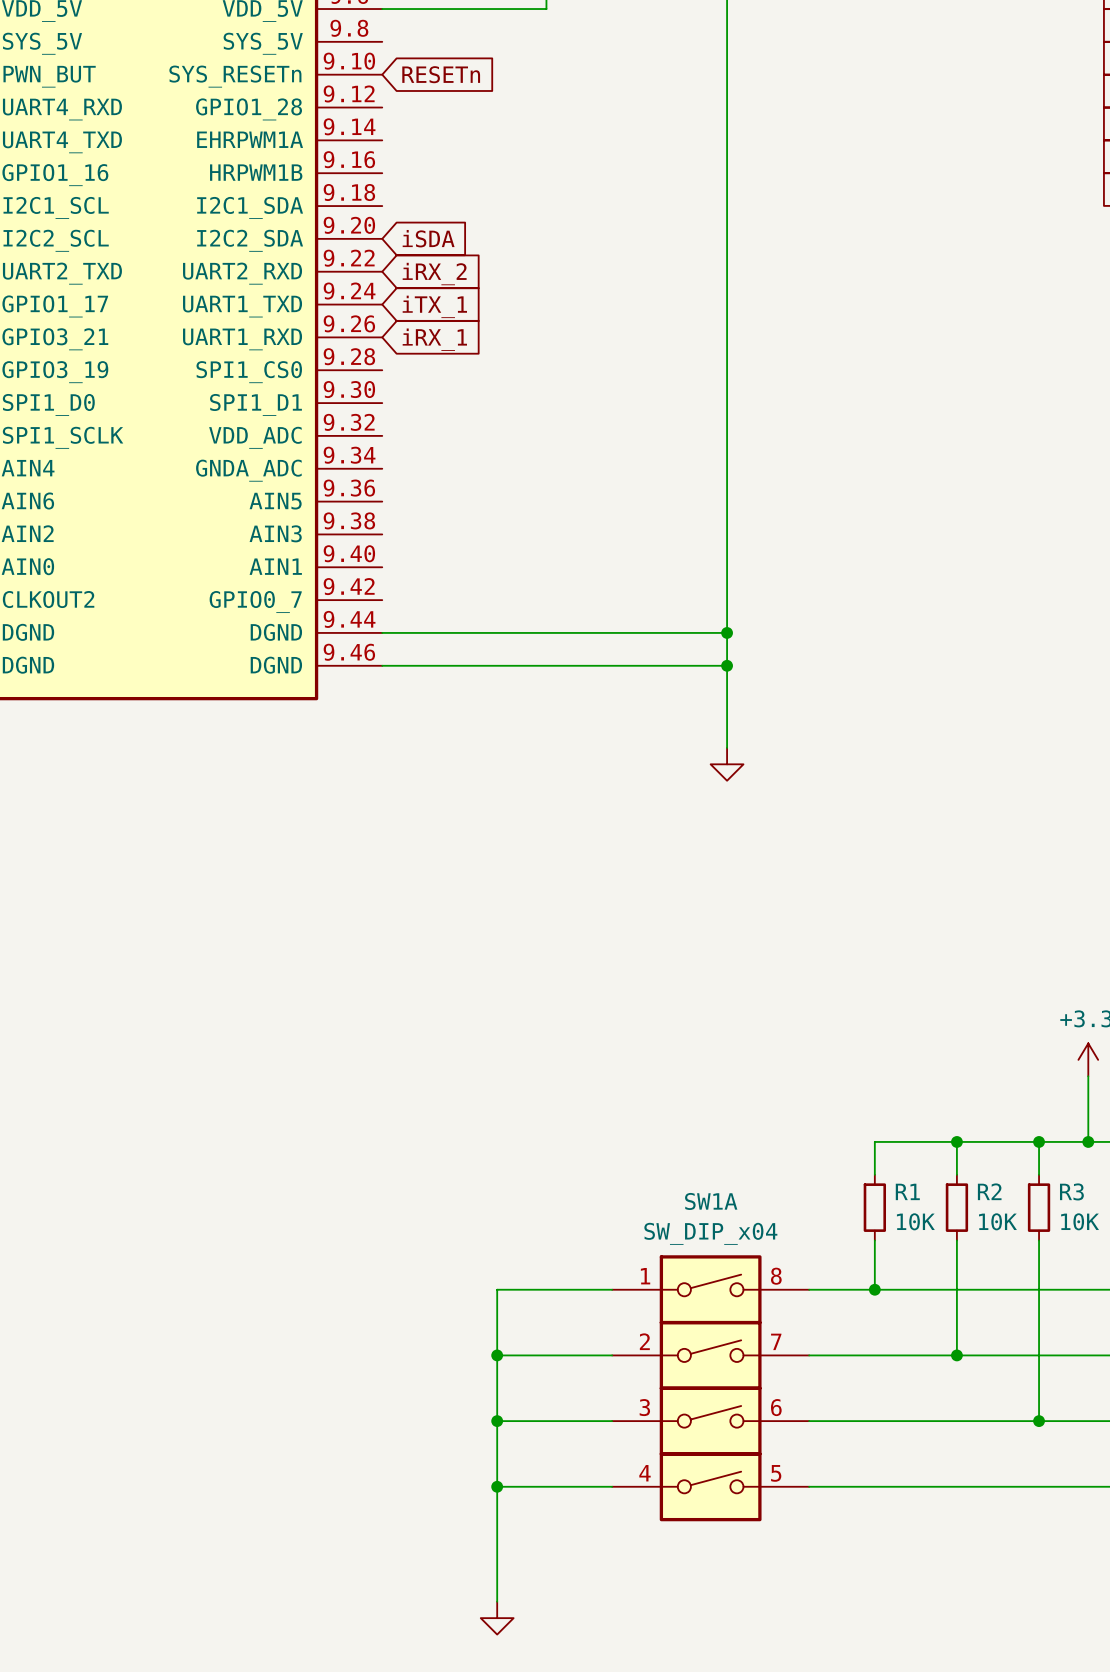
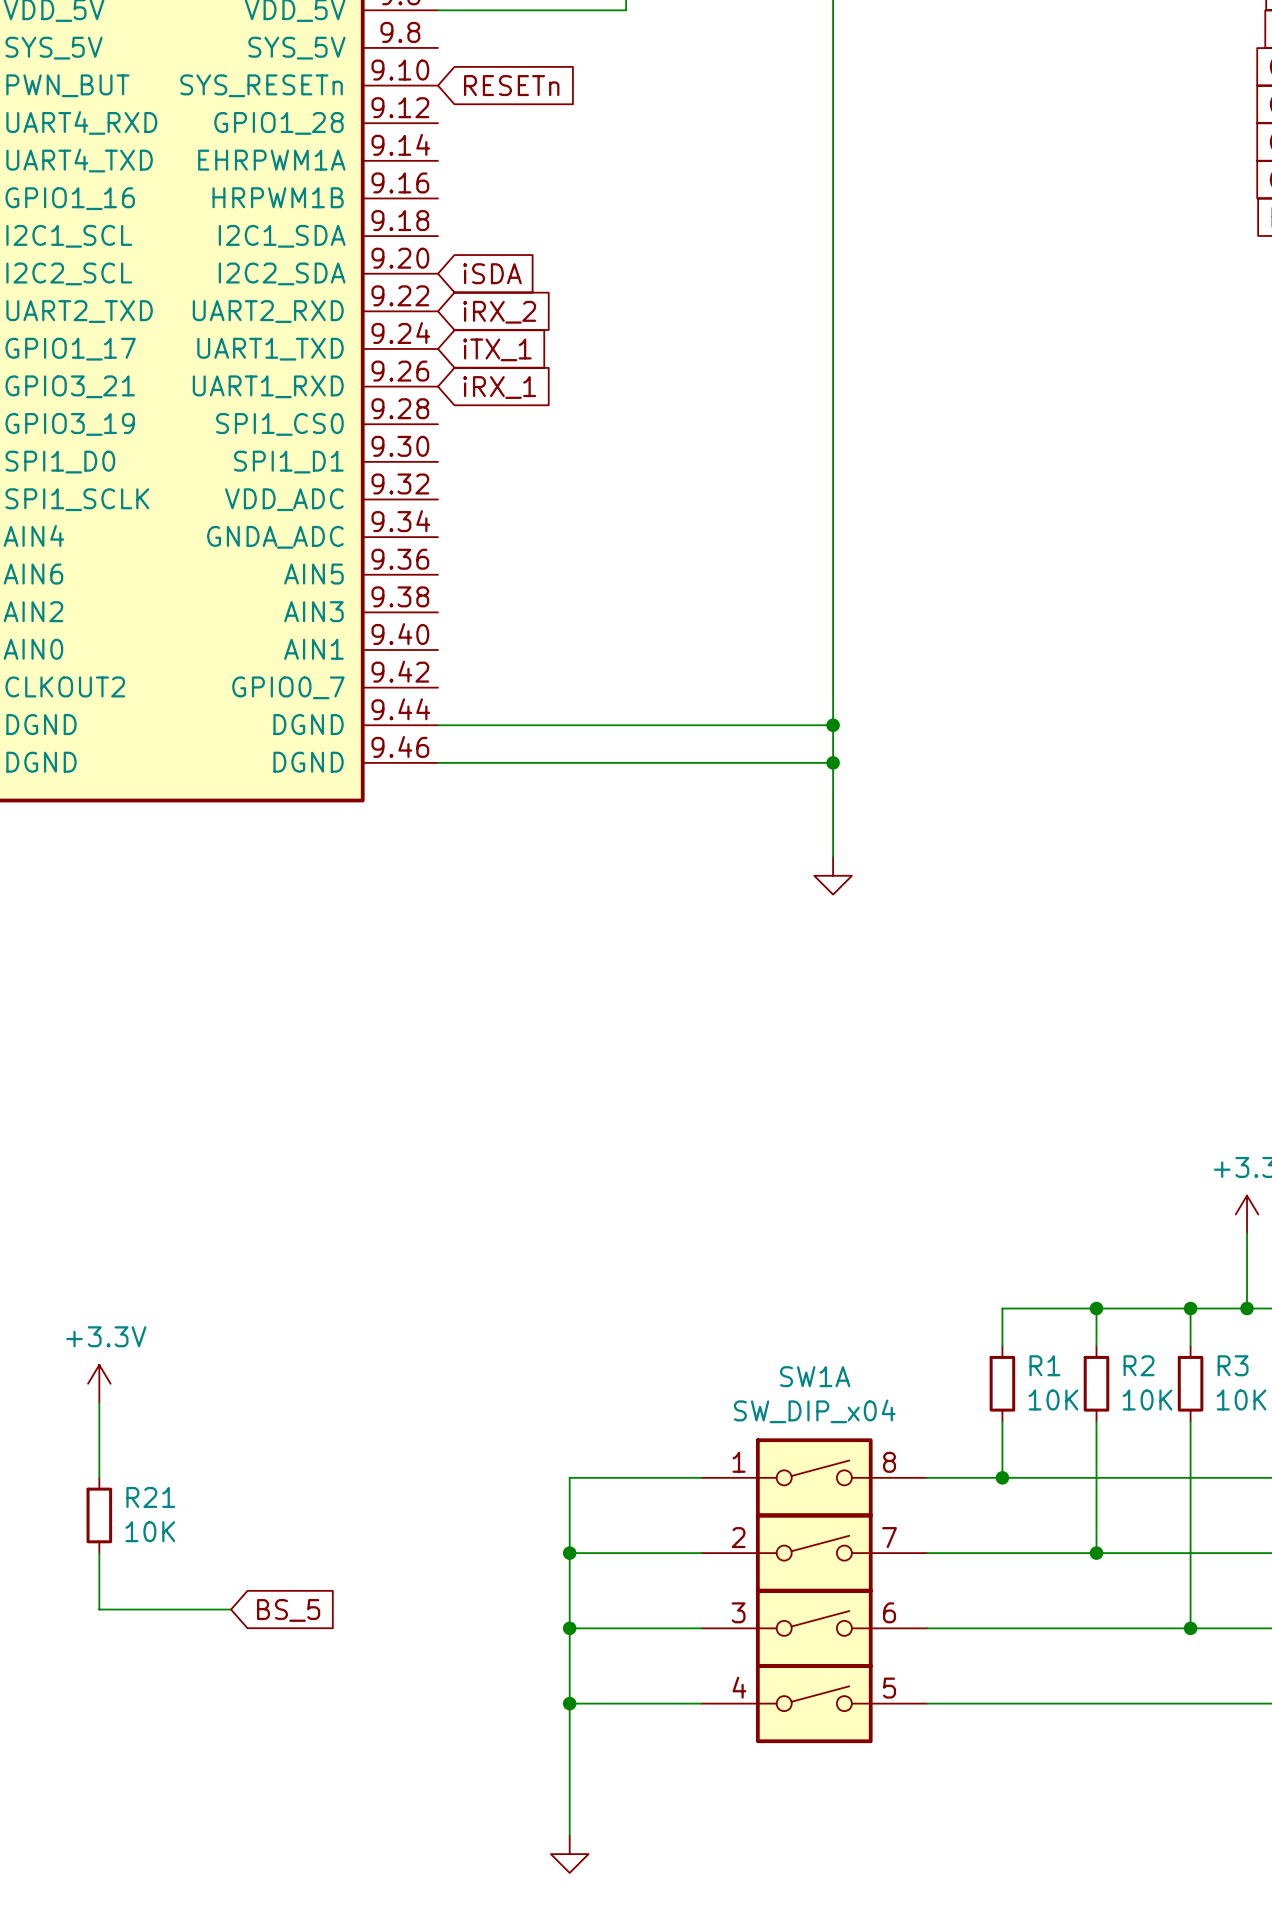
power symbol: none -> +3.3V (99, 1383)
wire: none -> (99, 1402) (99, 1477)
R21: none -> 10K (99, 1515)
wire: none -> (99, 1553) (99, 1609) (231, 1609)
global label: none -> BS_5 (288, 1610)

